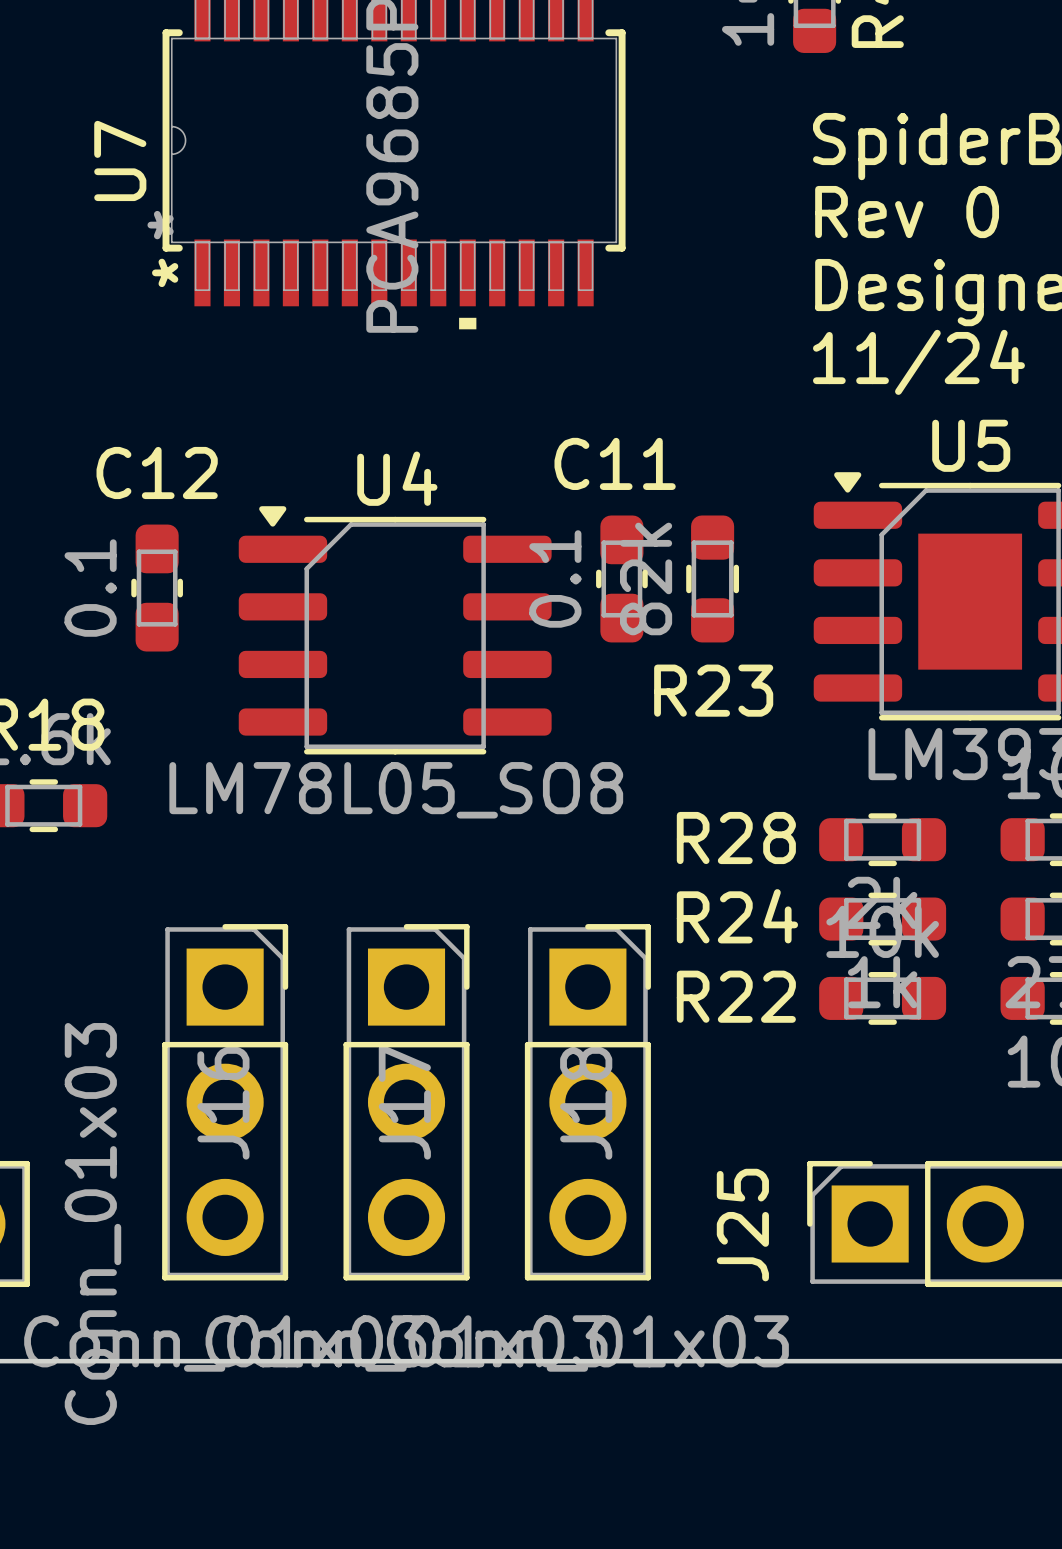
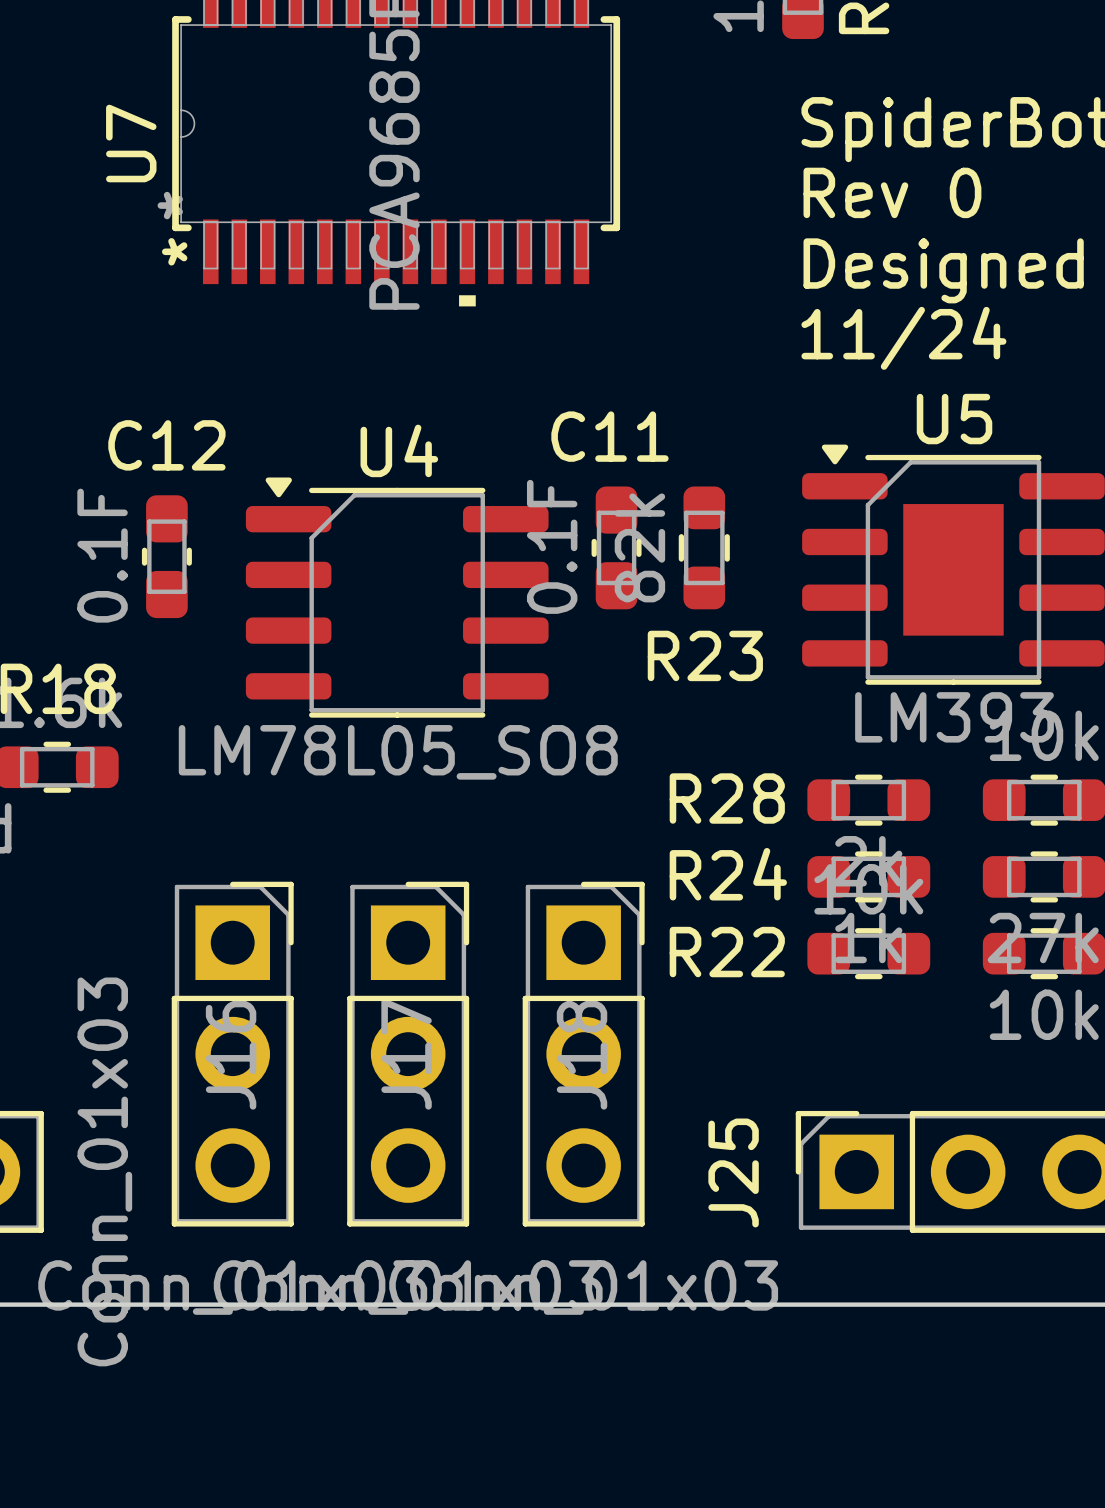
C11 value: 0.1 (555, 578) -> 0.1F (552, 546)
C12 value: 0.1 (90, 588) -> 0.1F (102, 555)

